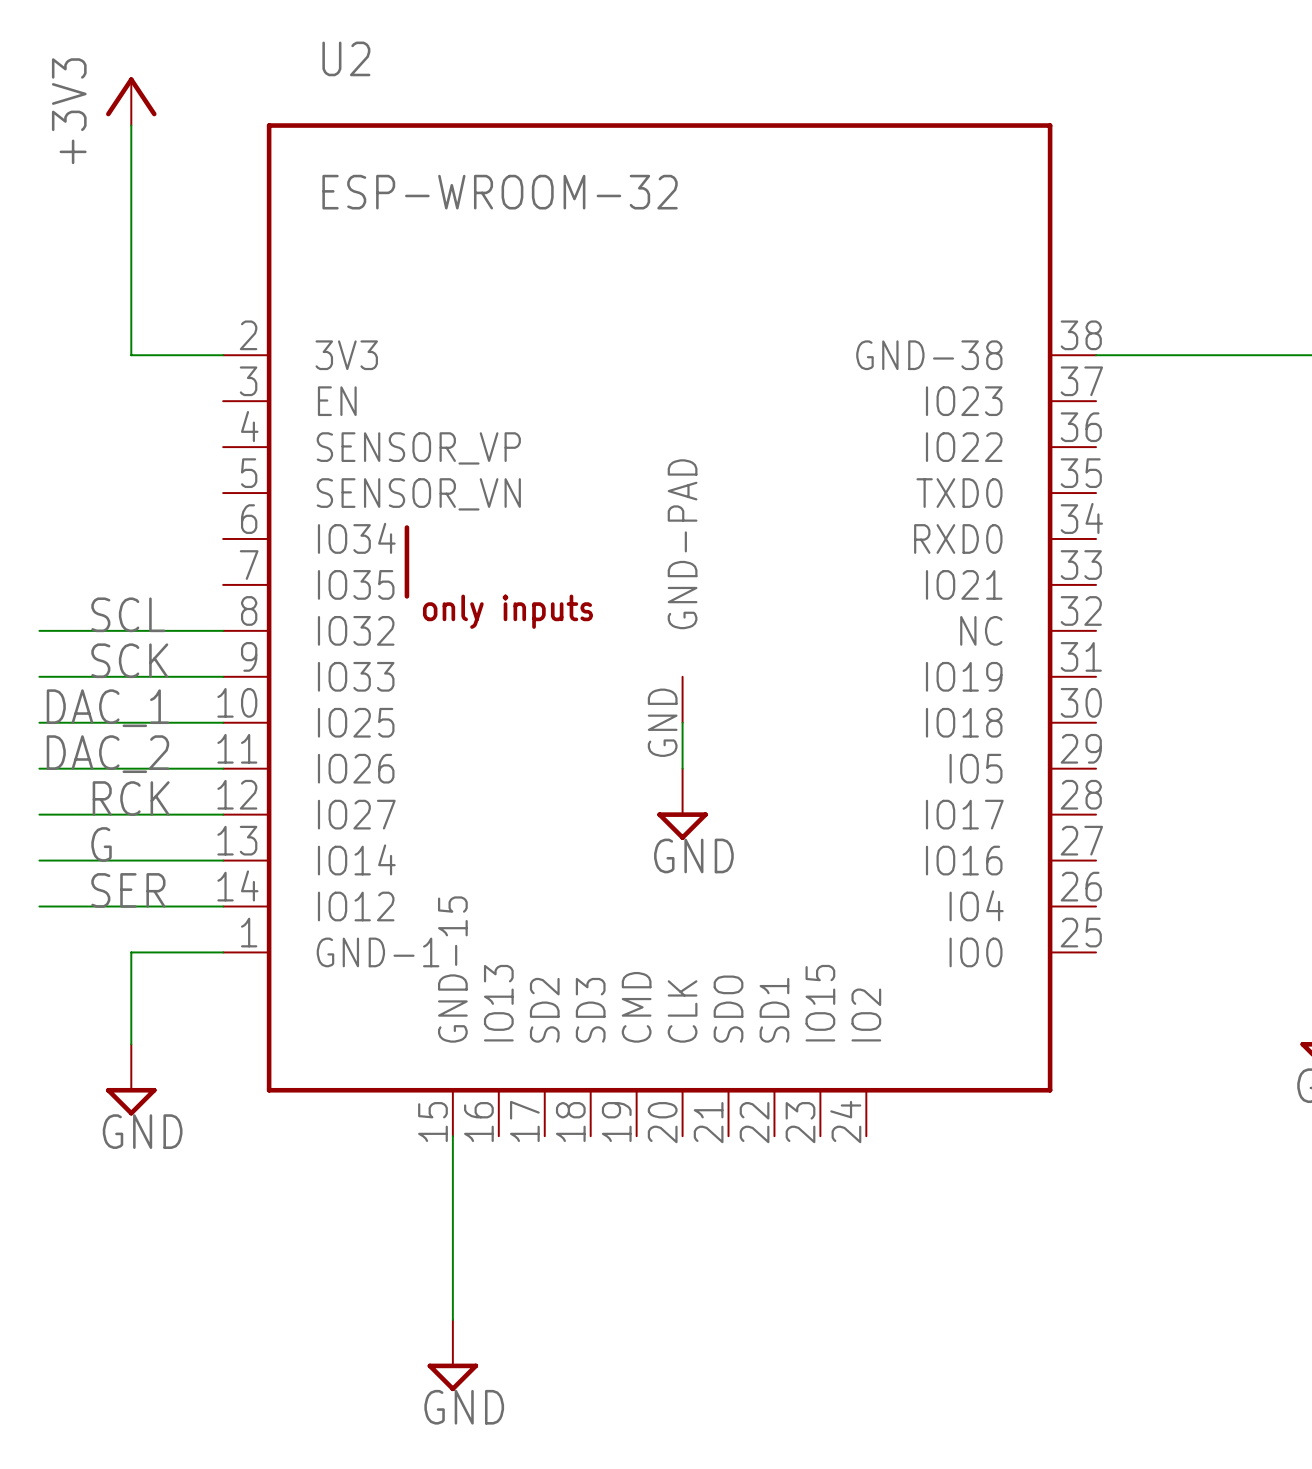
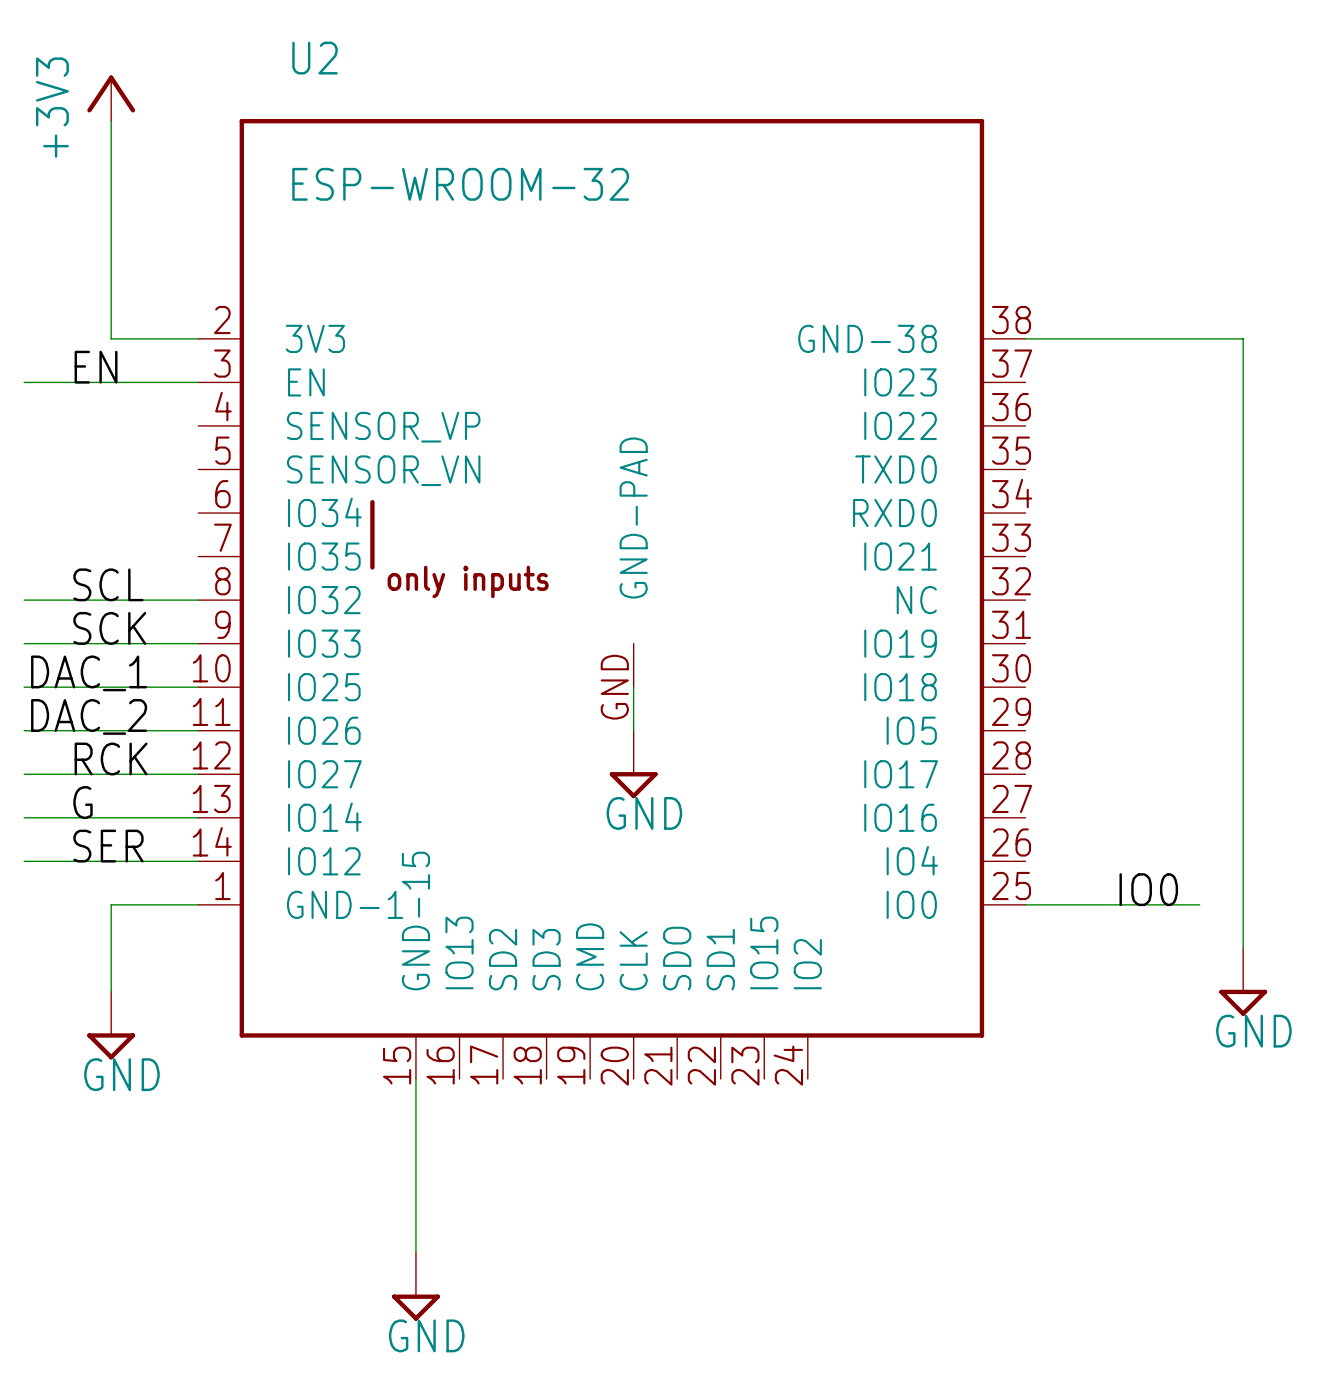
label: none -> EN (96, 367)
wire: none -> (24, 382) (198, 382)
label: none -> IO0 (1148, 889)
wire: none -> (1025, 904) (1199, 904)

